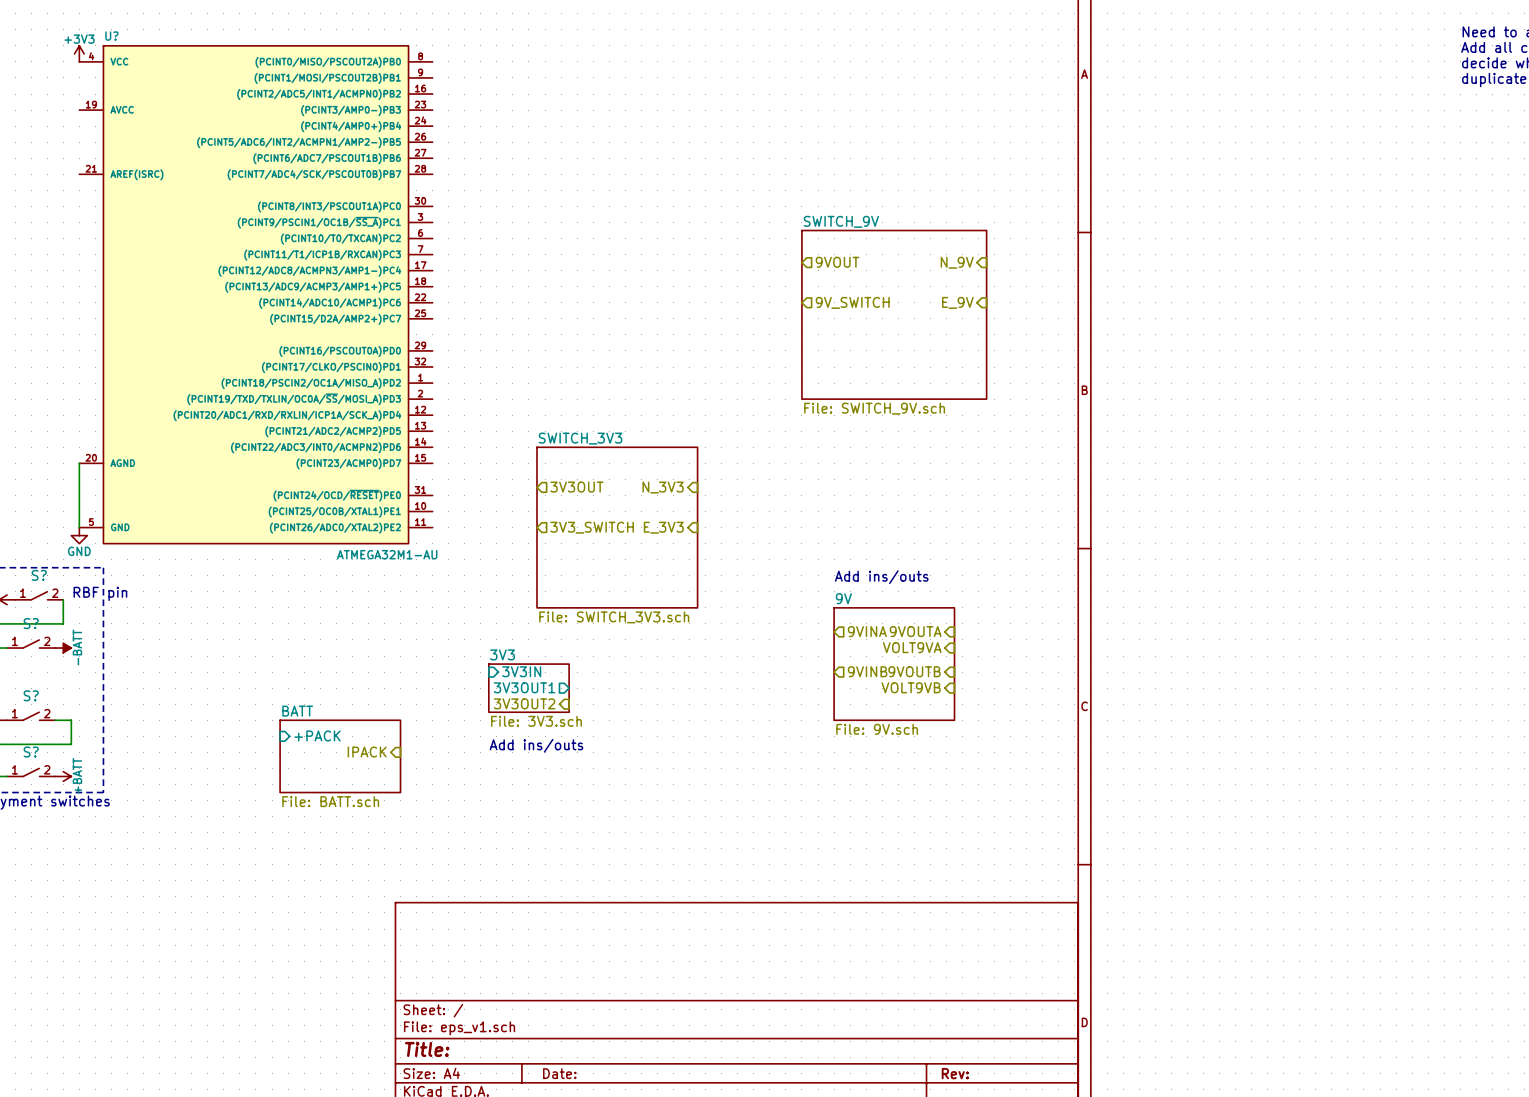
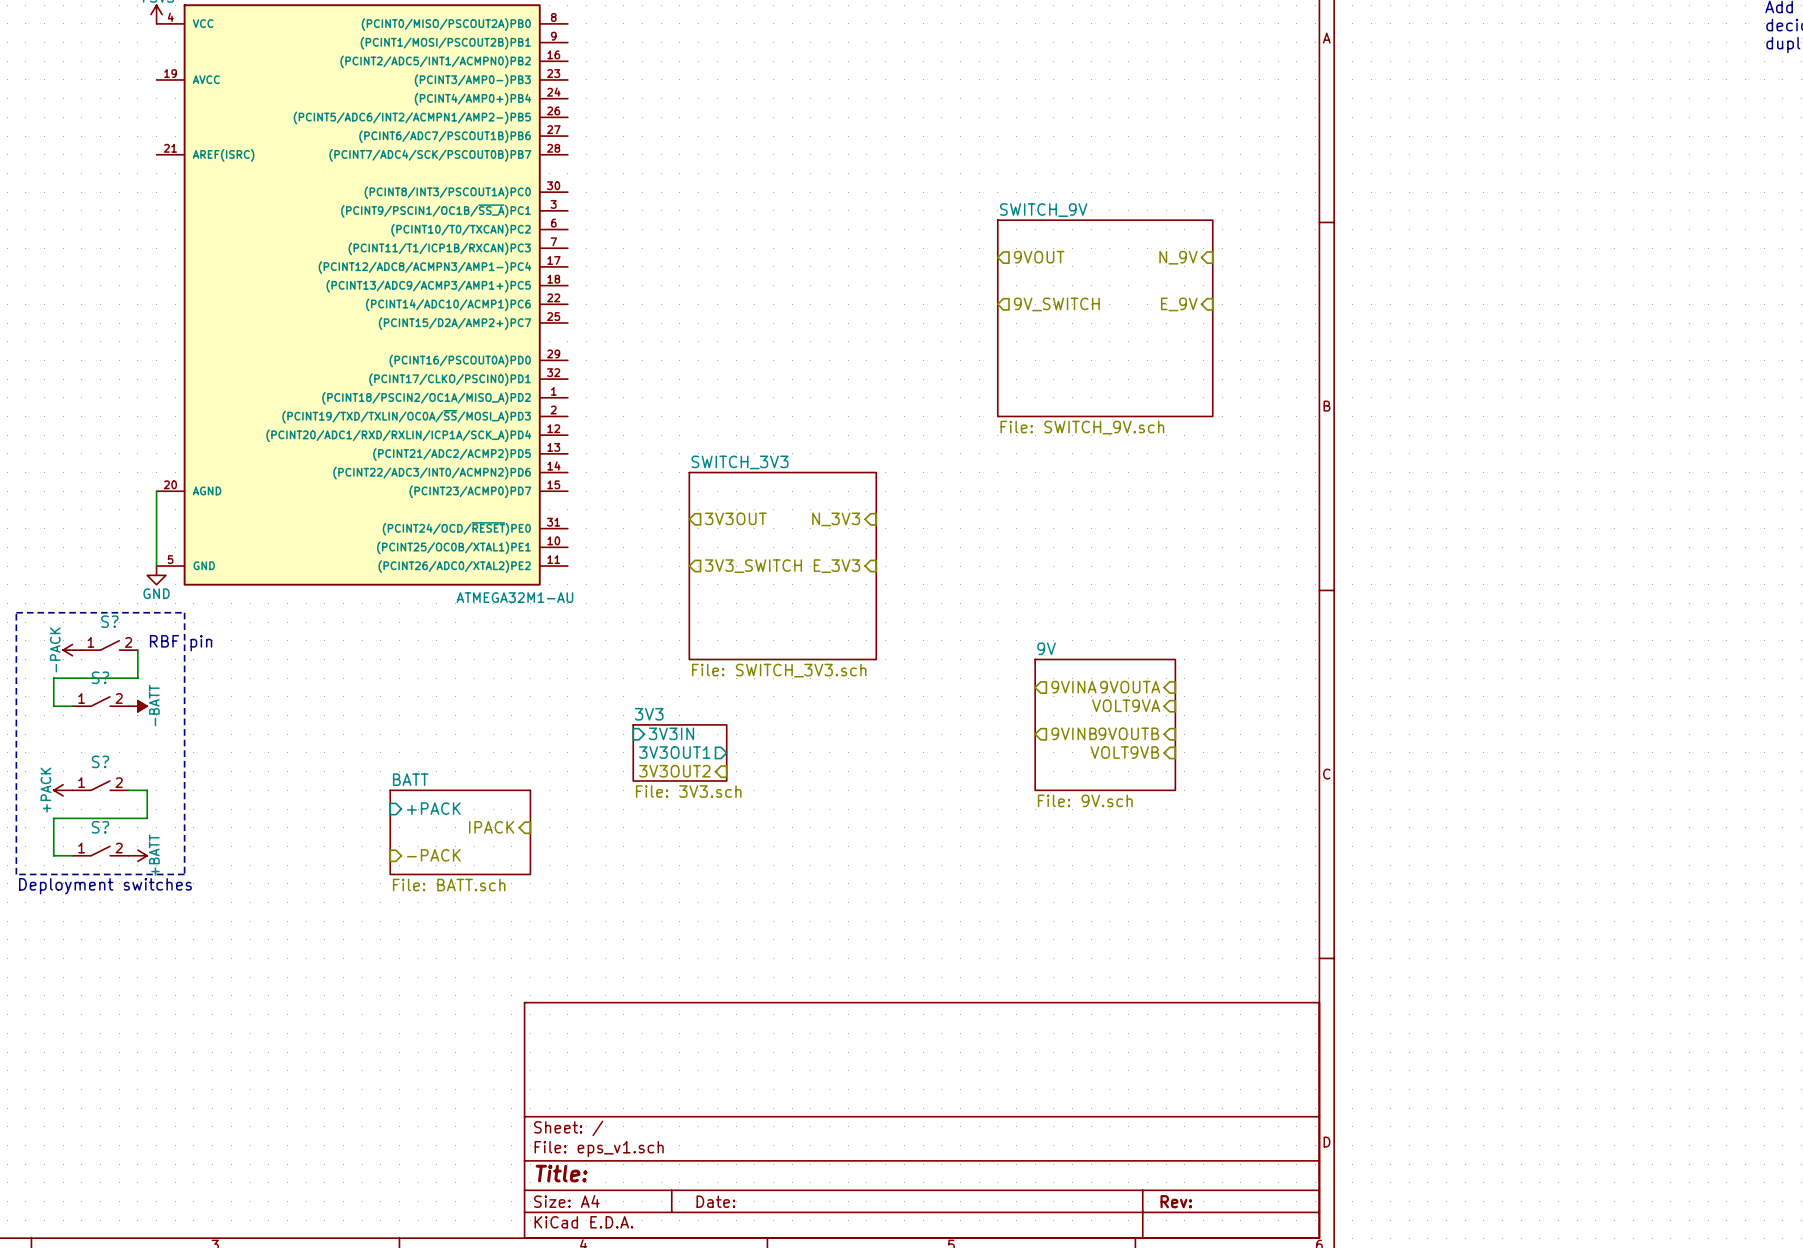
text: Add ins/outs (881, 577) -> none
text: Add ins/outs (536, 745) -> none
hierarchical label: none -> -PACK (433, 855)

